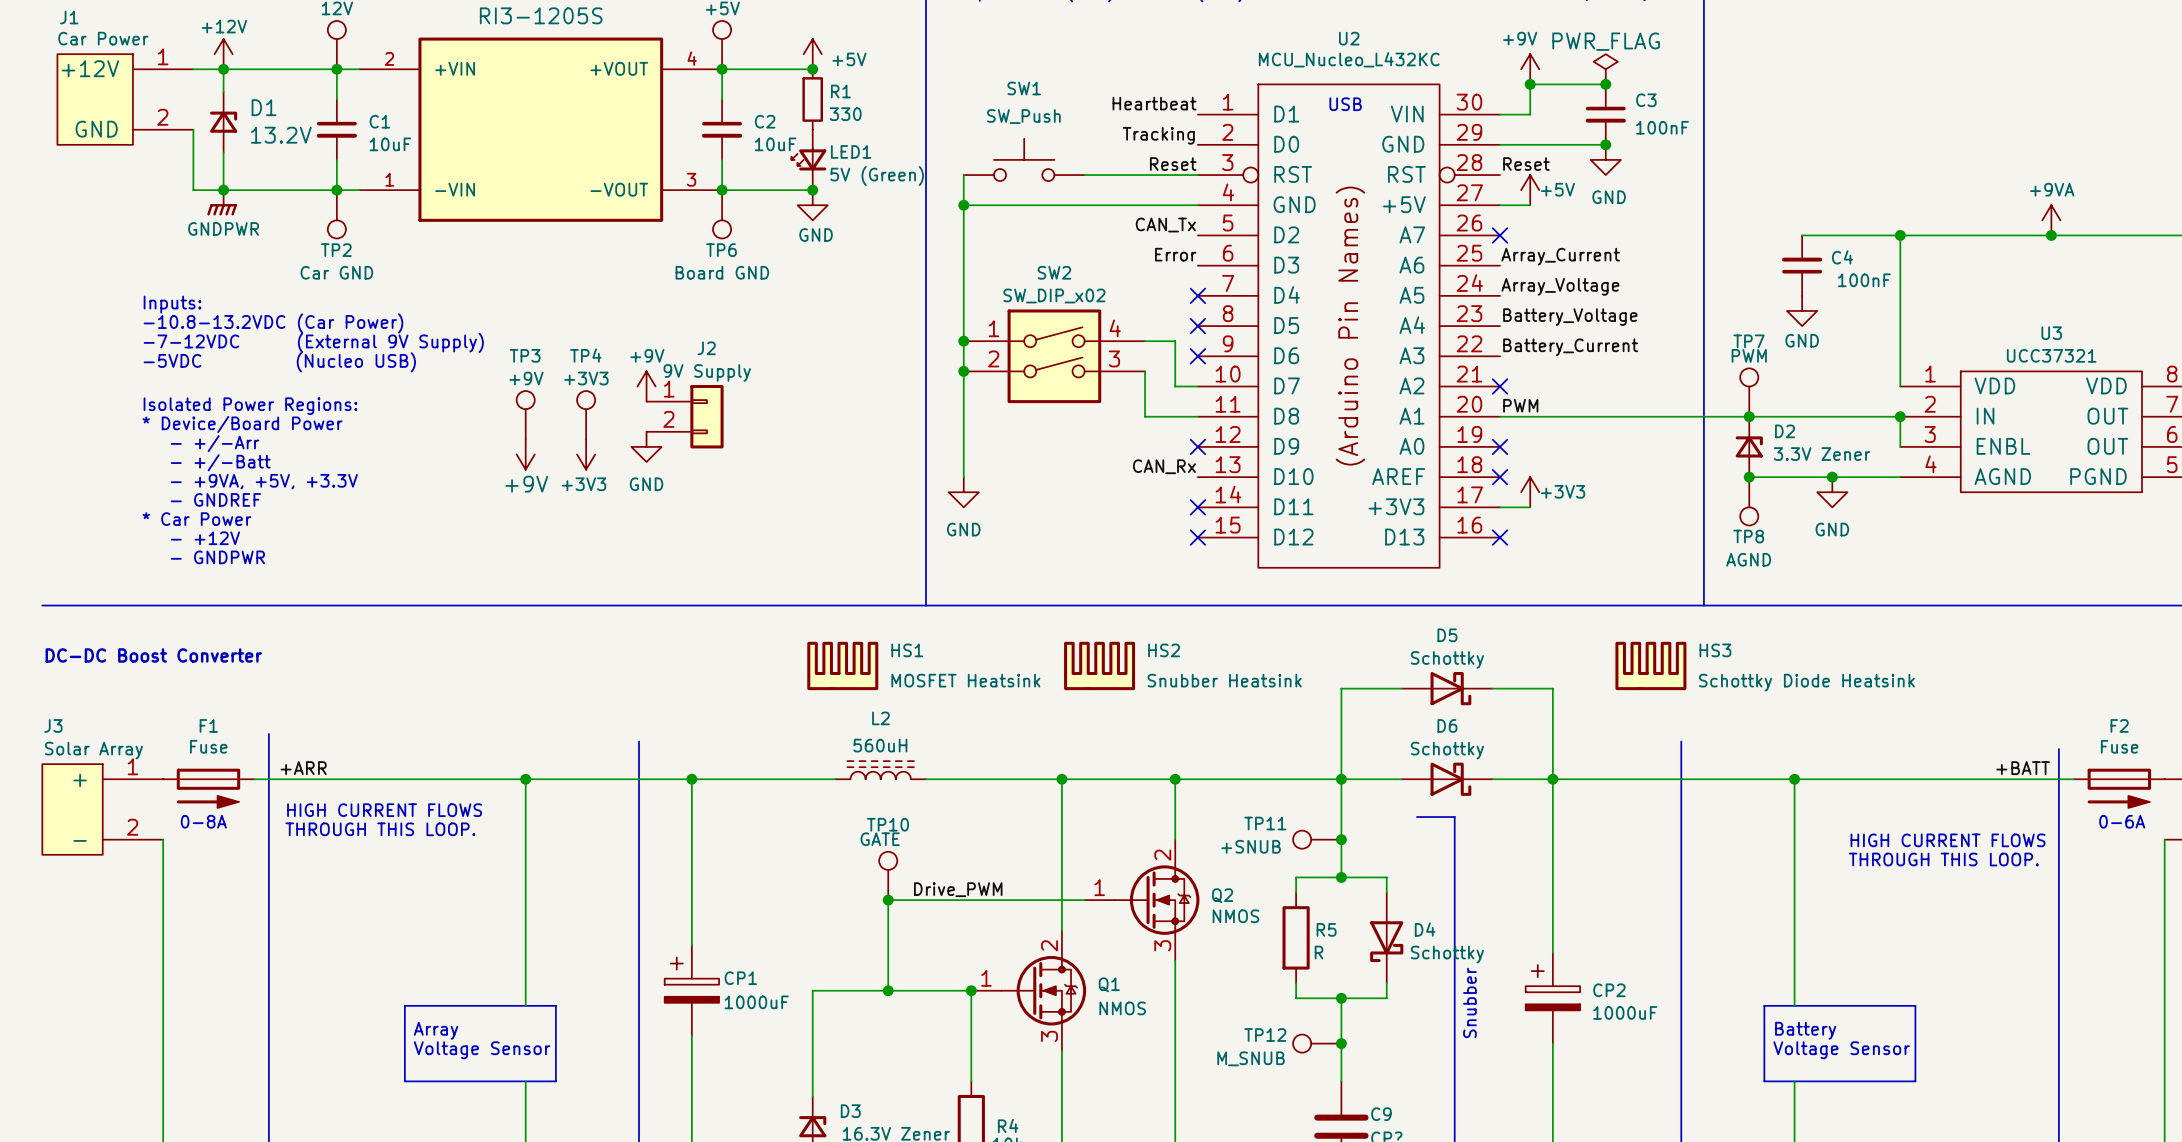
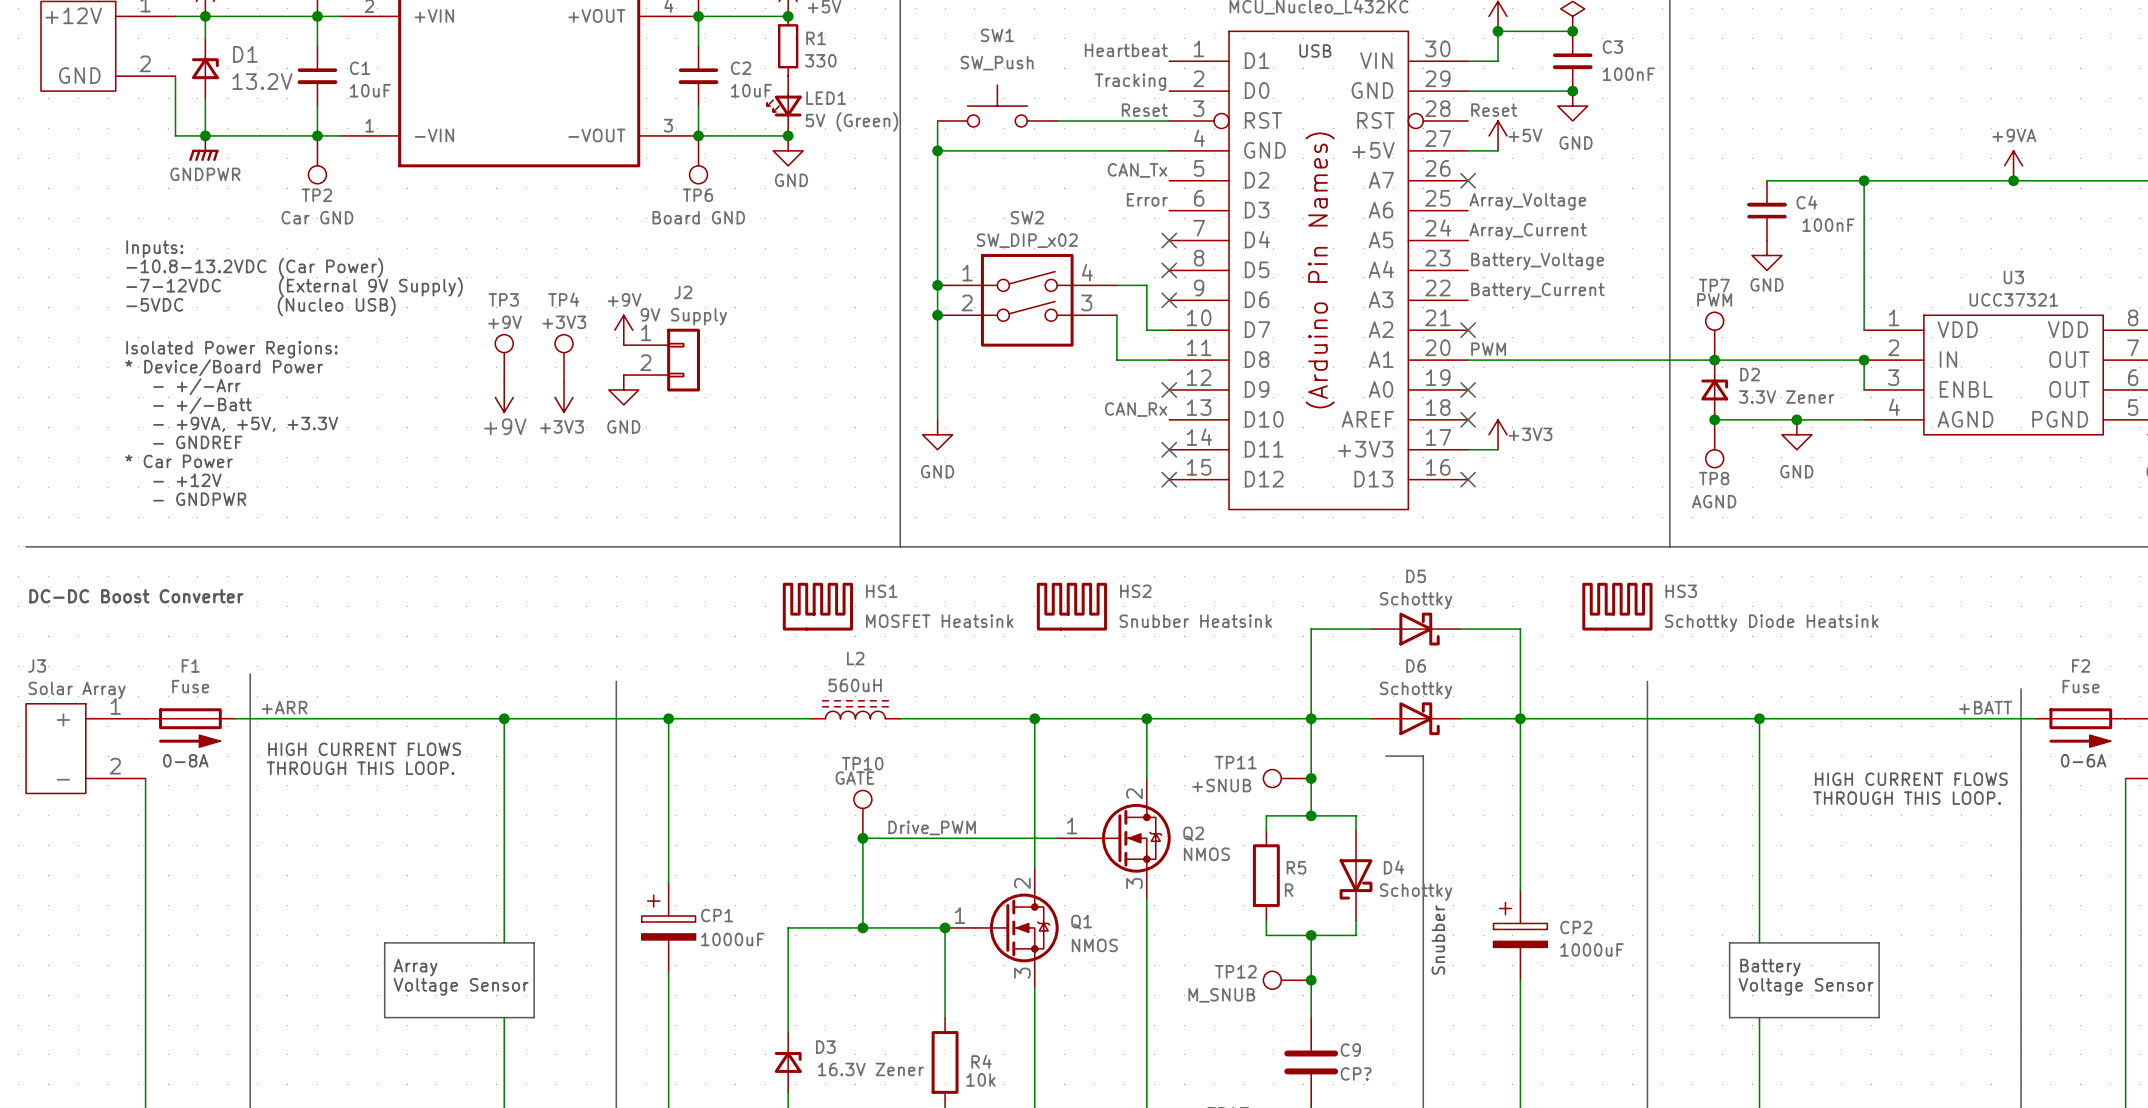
label: Array_Current (1560, 256) -> Array_Voltage (1527, 201)
label: Array_Voltage (1560, 286) -> Array_Current (1528, 231)

